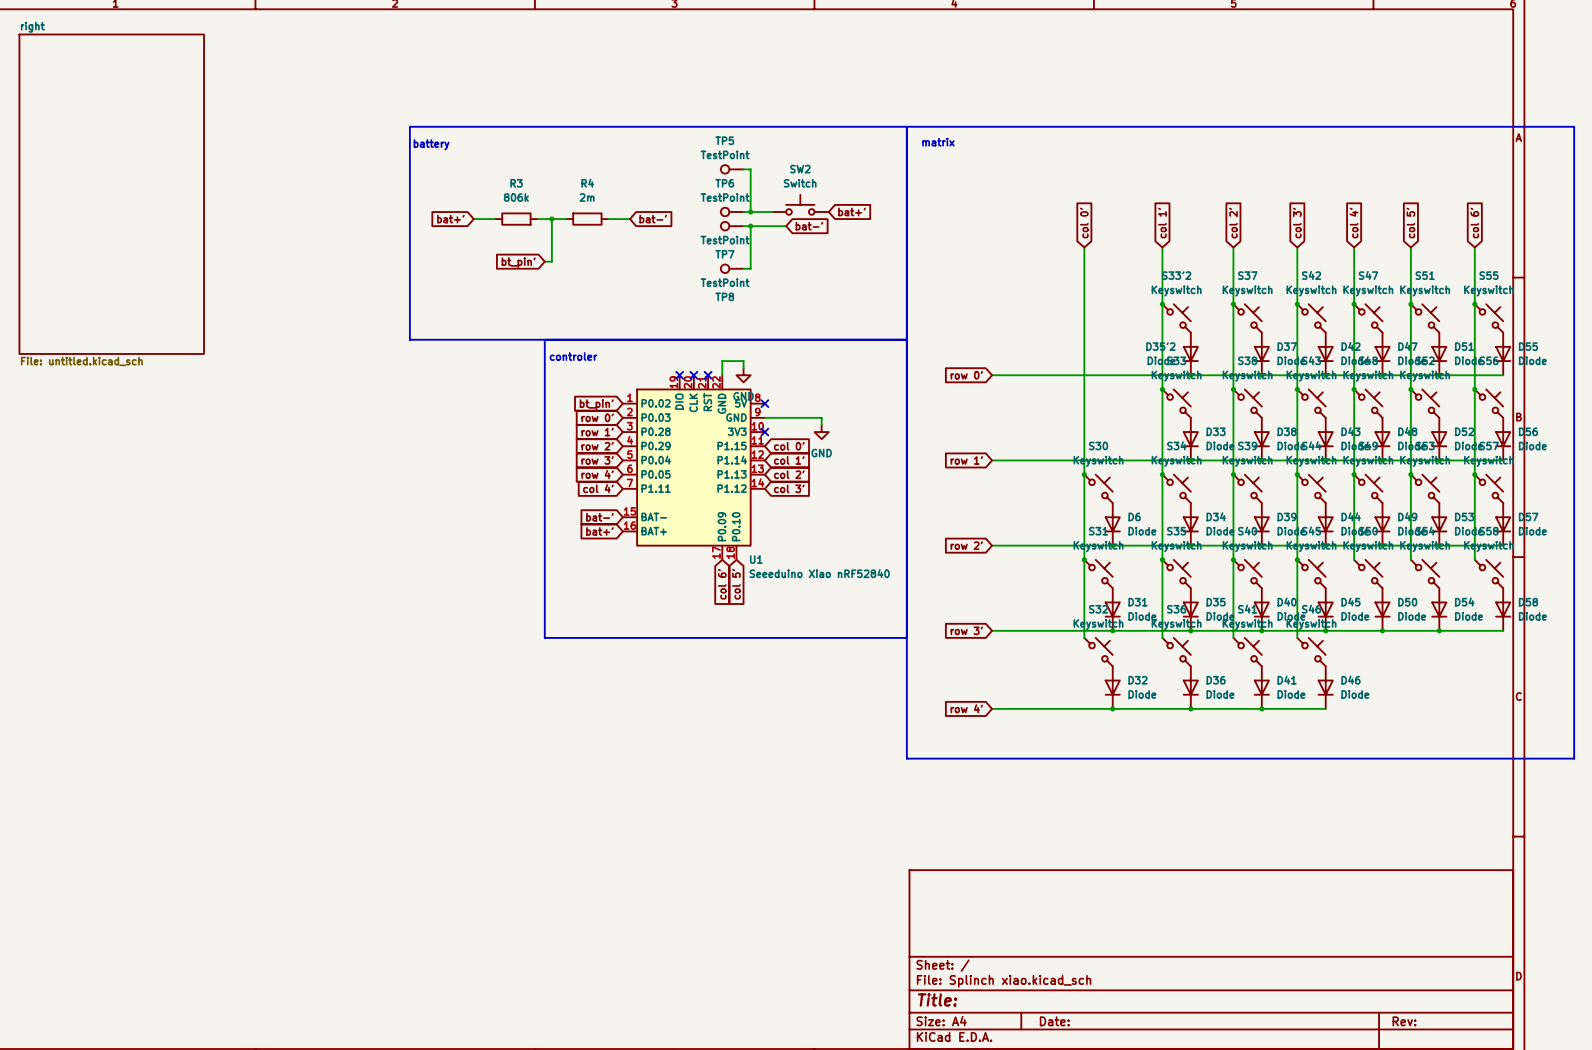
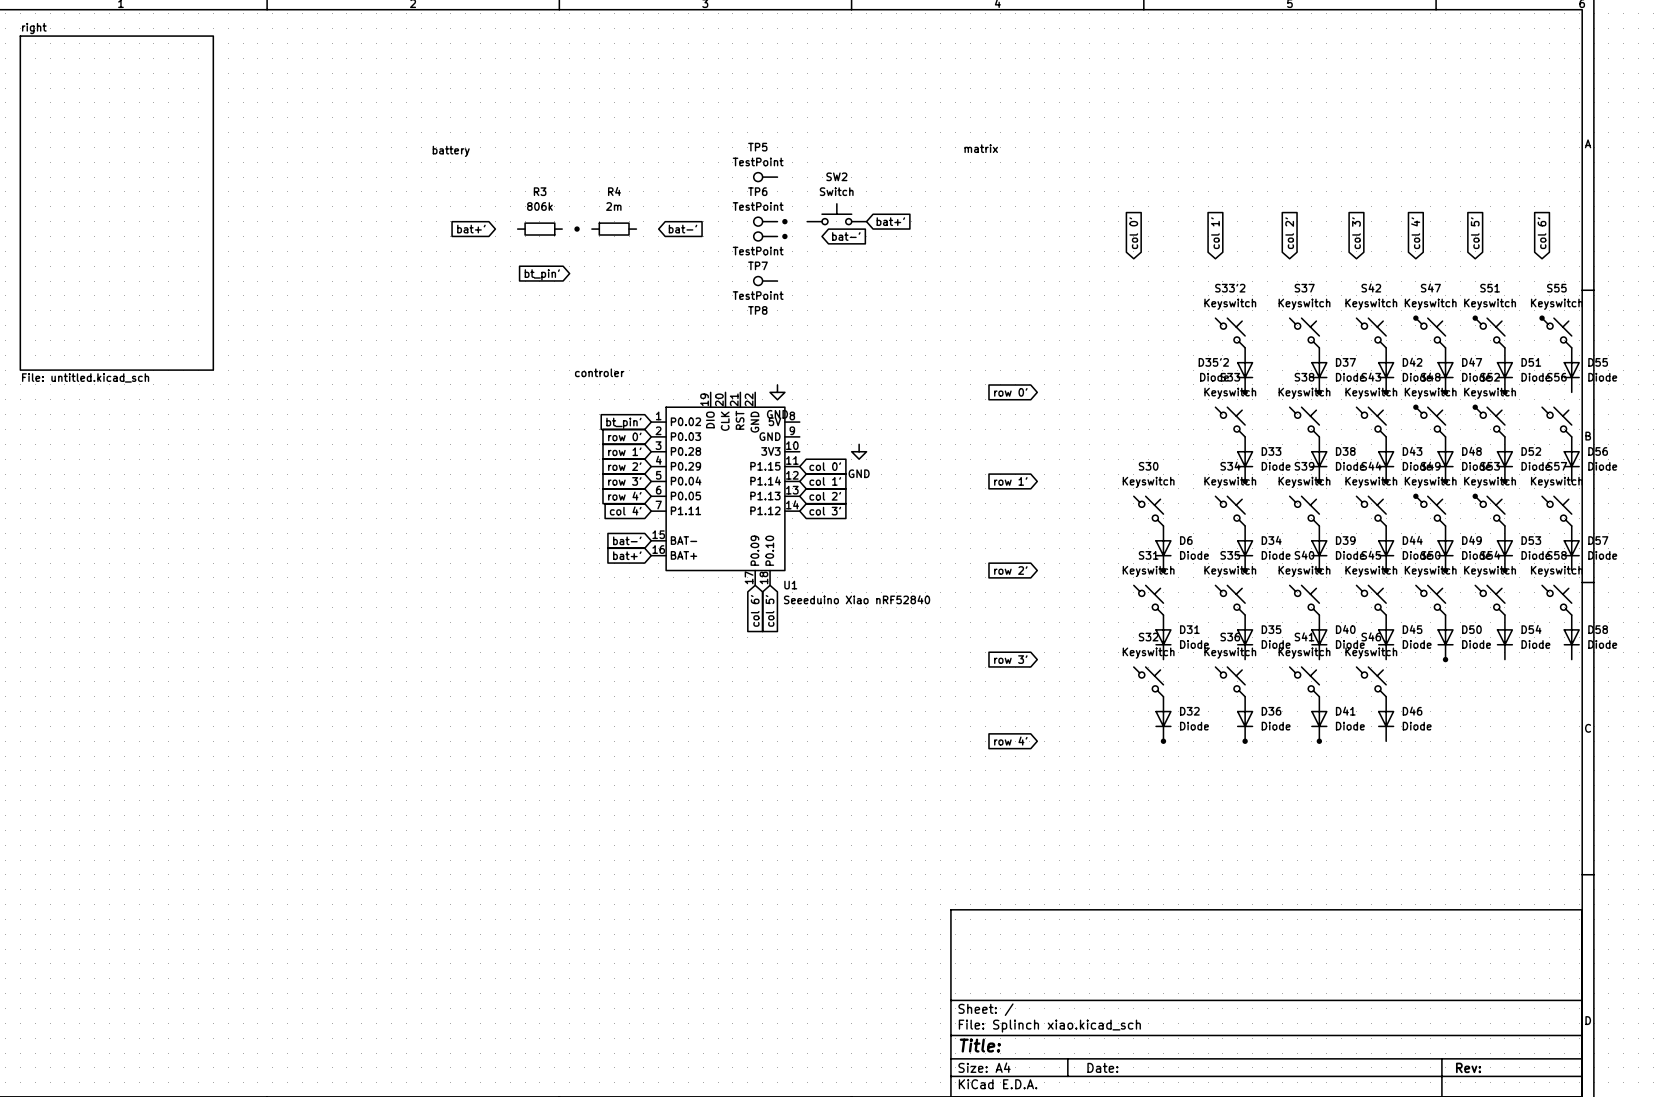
line: (906, 126) (906, 758) (1574, 758) (1574, 126) (409, 126) (409, 339) (906, 339) -> none
wire: (743, 169) (750, 169) (750, 211) -> none
wire: (743, 211) (771, 211) -> none
wire: (473, 219) (495, 219) -> none
wire: (537, 219) (566, 219) -> none
wire: (551, 219) (551, 261) (544, 261) -> none
wire: (608, 219) (629, 219) -> none
wire: (743, 226) (786, 226) -> none
wire: (750, 226) (750, 268) (743, 268) -> none
wire: (1084, 247) (1084, 637) -> none
wire: (1162, 247) (1162, 637) -> none
wire: (1233, 247) (1233, 637) -> none
wire: (1297, 247) (1297, 637) -> none
wire: (1354, 247) (1354, 559) -> none
wire: (1410, 247) (1410, 559) -> none
wire: (1474, 247) (1474, 559) -> none
junction: (1162, 304) -> none
junction: (1233, 304) -> none
junction: (1297, 304) -> none
line: (544, 339) (544, 637) (906, 637) -> none
wire: (743, 368) (743, 361) (722, 361) (722, 375) -> none
no-connect mark: (679, 375) -> none
no-connect mark: (693, 375) -> none
no-connect mark: (708, 375) -> none
wire: (992, 375) (1503, 375) -> none
junction: (1162, 389) -> none
junction: (1233, 389) -> none
junction: (1297, 389) -> none
junction: (1474, 389) -> none
no-connect mark: (764, 403) -> none
wire: (764, 417) (821, 417) (821, 424) -> none
no-connect mark: (764, 432) -> none
wire: (992, 460) (1503, 460) -> none
junction: (1084, 474) -> none
junction: (1162, 474) -> none
junction: (1233, 474) -> none
junction: (1297, 474) -> none
junction: (1474, 474) -> none
wire: (992, 545) (1503, 545) -> none
junction: (1084, 559) -> none
junction: (1162, 559) -> none
junction: (1233, 559) -> none
junction: (1297, 559) -> none
wire: (992, 630) (1503, 630) -> none
junction: (1112, 630) -> none
junction: (1190, 630) -> none
junction: (1261, 630) -> none
junction: (1325, 630) -> none
junction: (1439, 630) -> none
wire: (992, 708) (1325, 708) -> none

